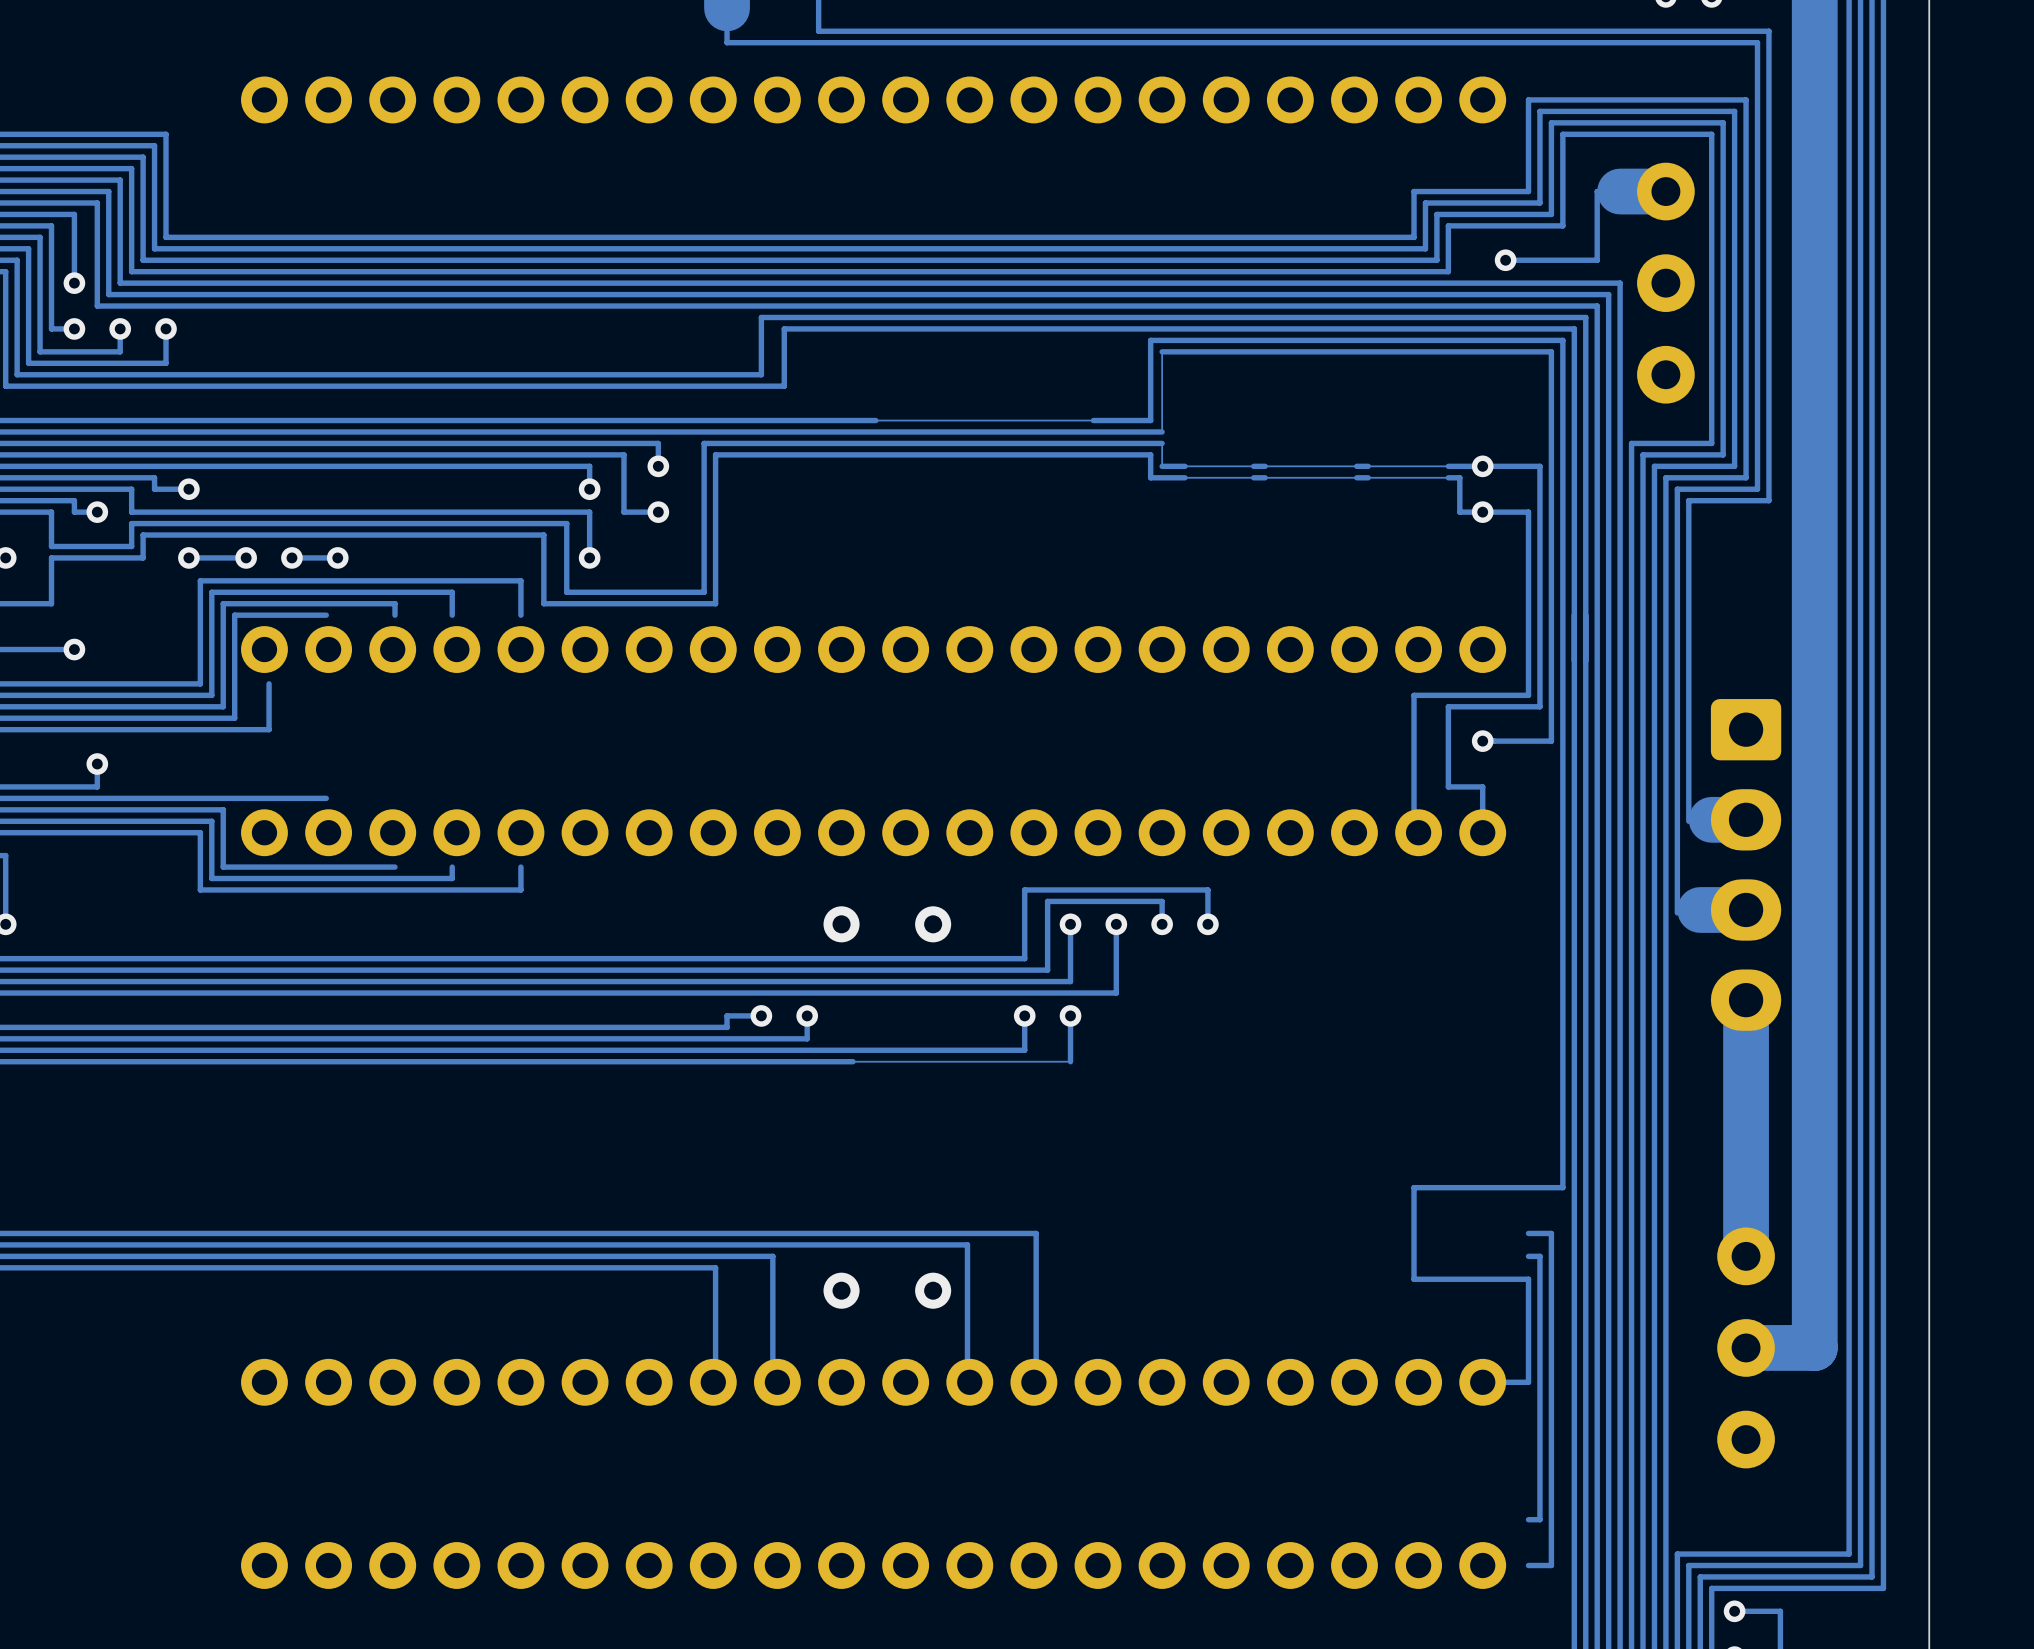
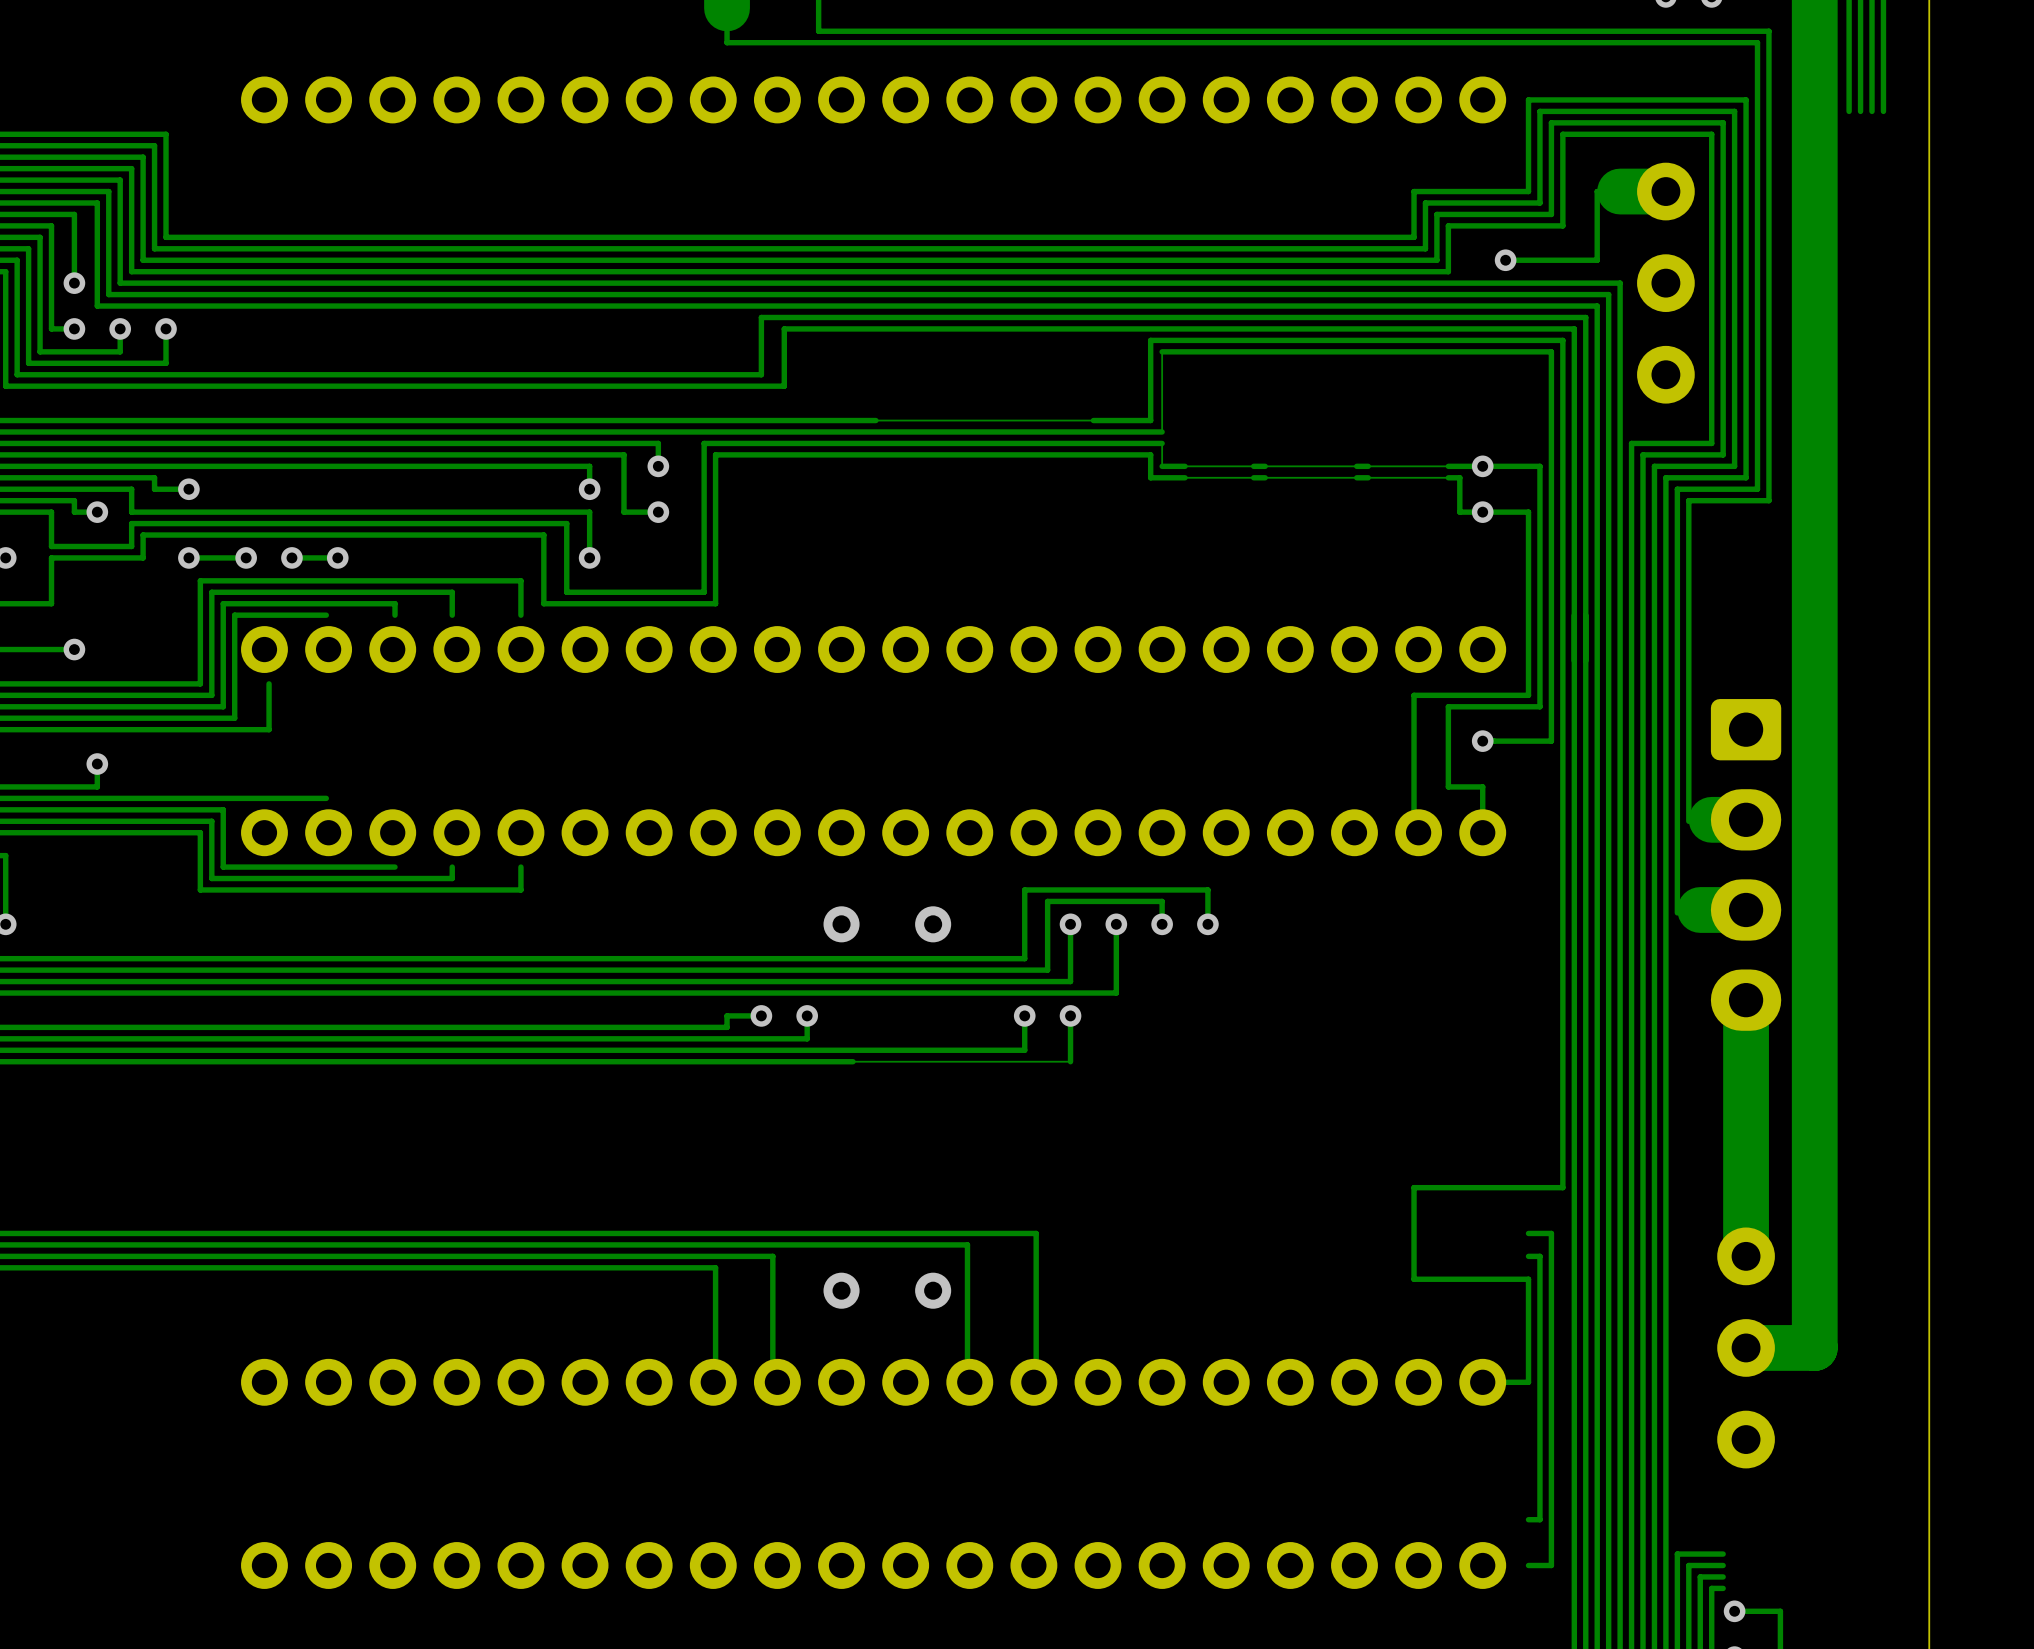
track: (1849, 111) (1849, 1554) (1723, 1554) -> none
track: (1860, 111) (1860, 1565) (1723, 1565) -> none
track: (1872, 111) (1872, 1576) (1723, 1576) -> none
track: (1883, 111) (1883, 1588) (1723, 1588) -> none

